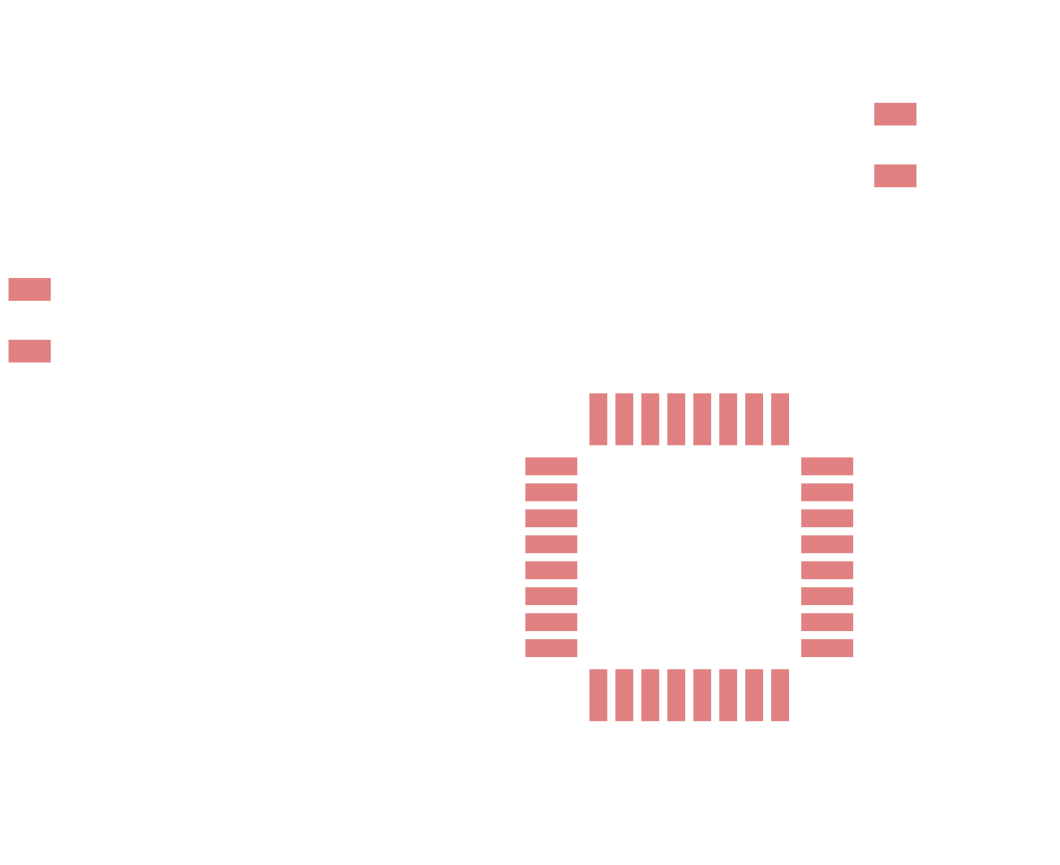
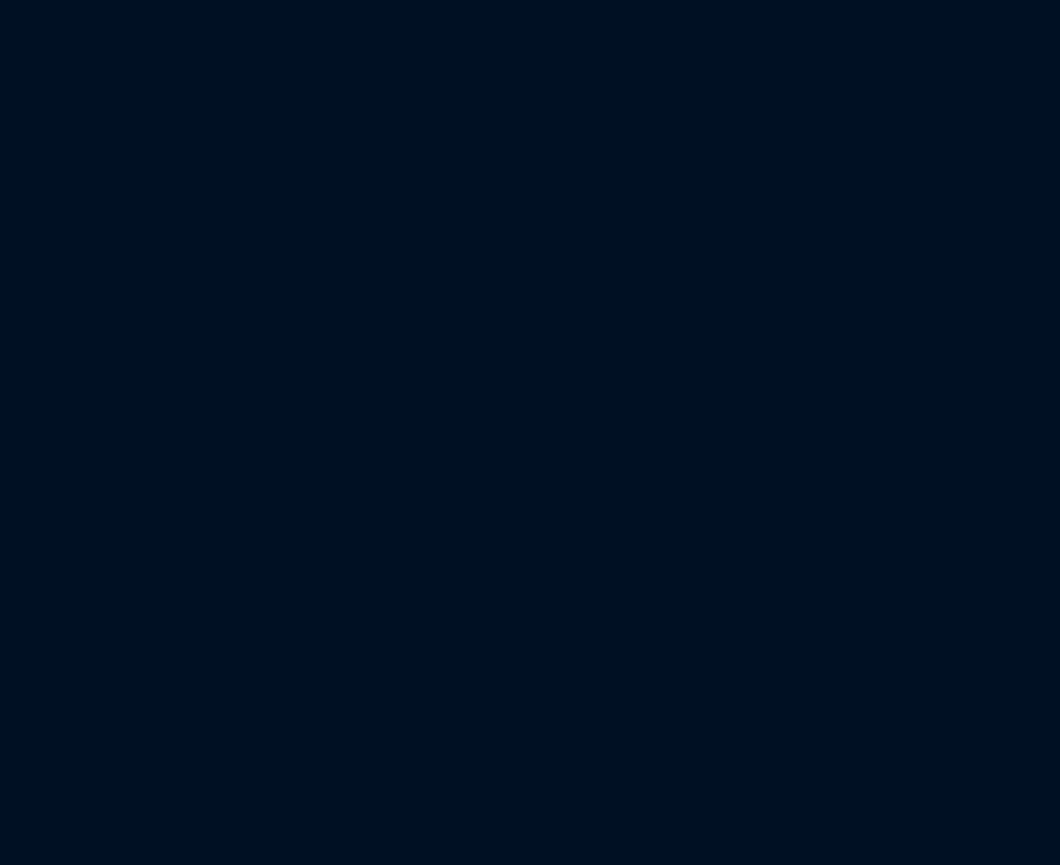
part: (895, 144) -> none
part: (29, 320) -> none
part: (689, 557) -> none

